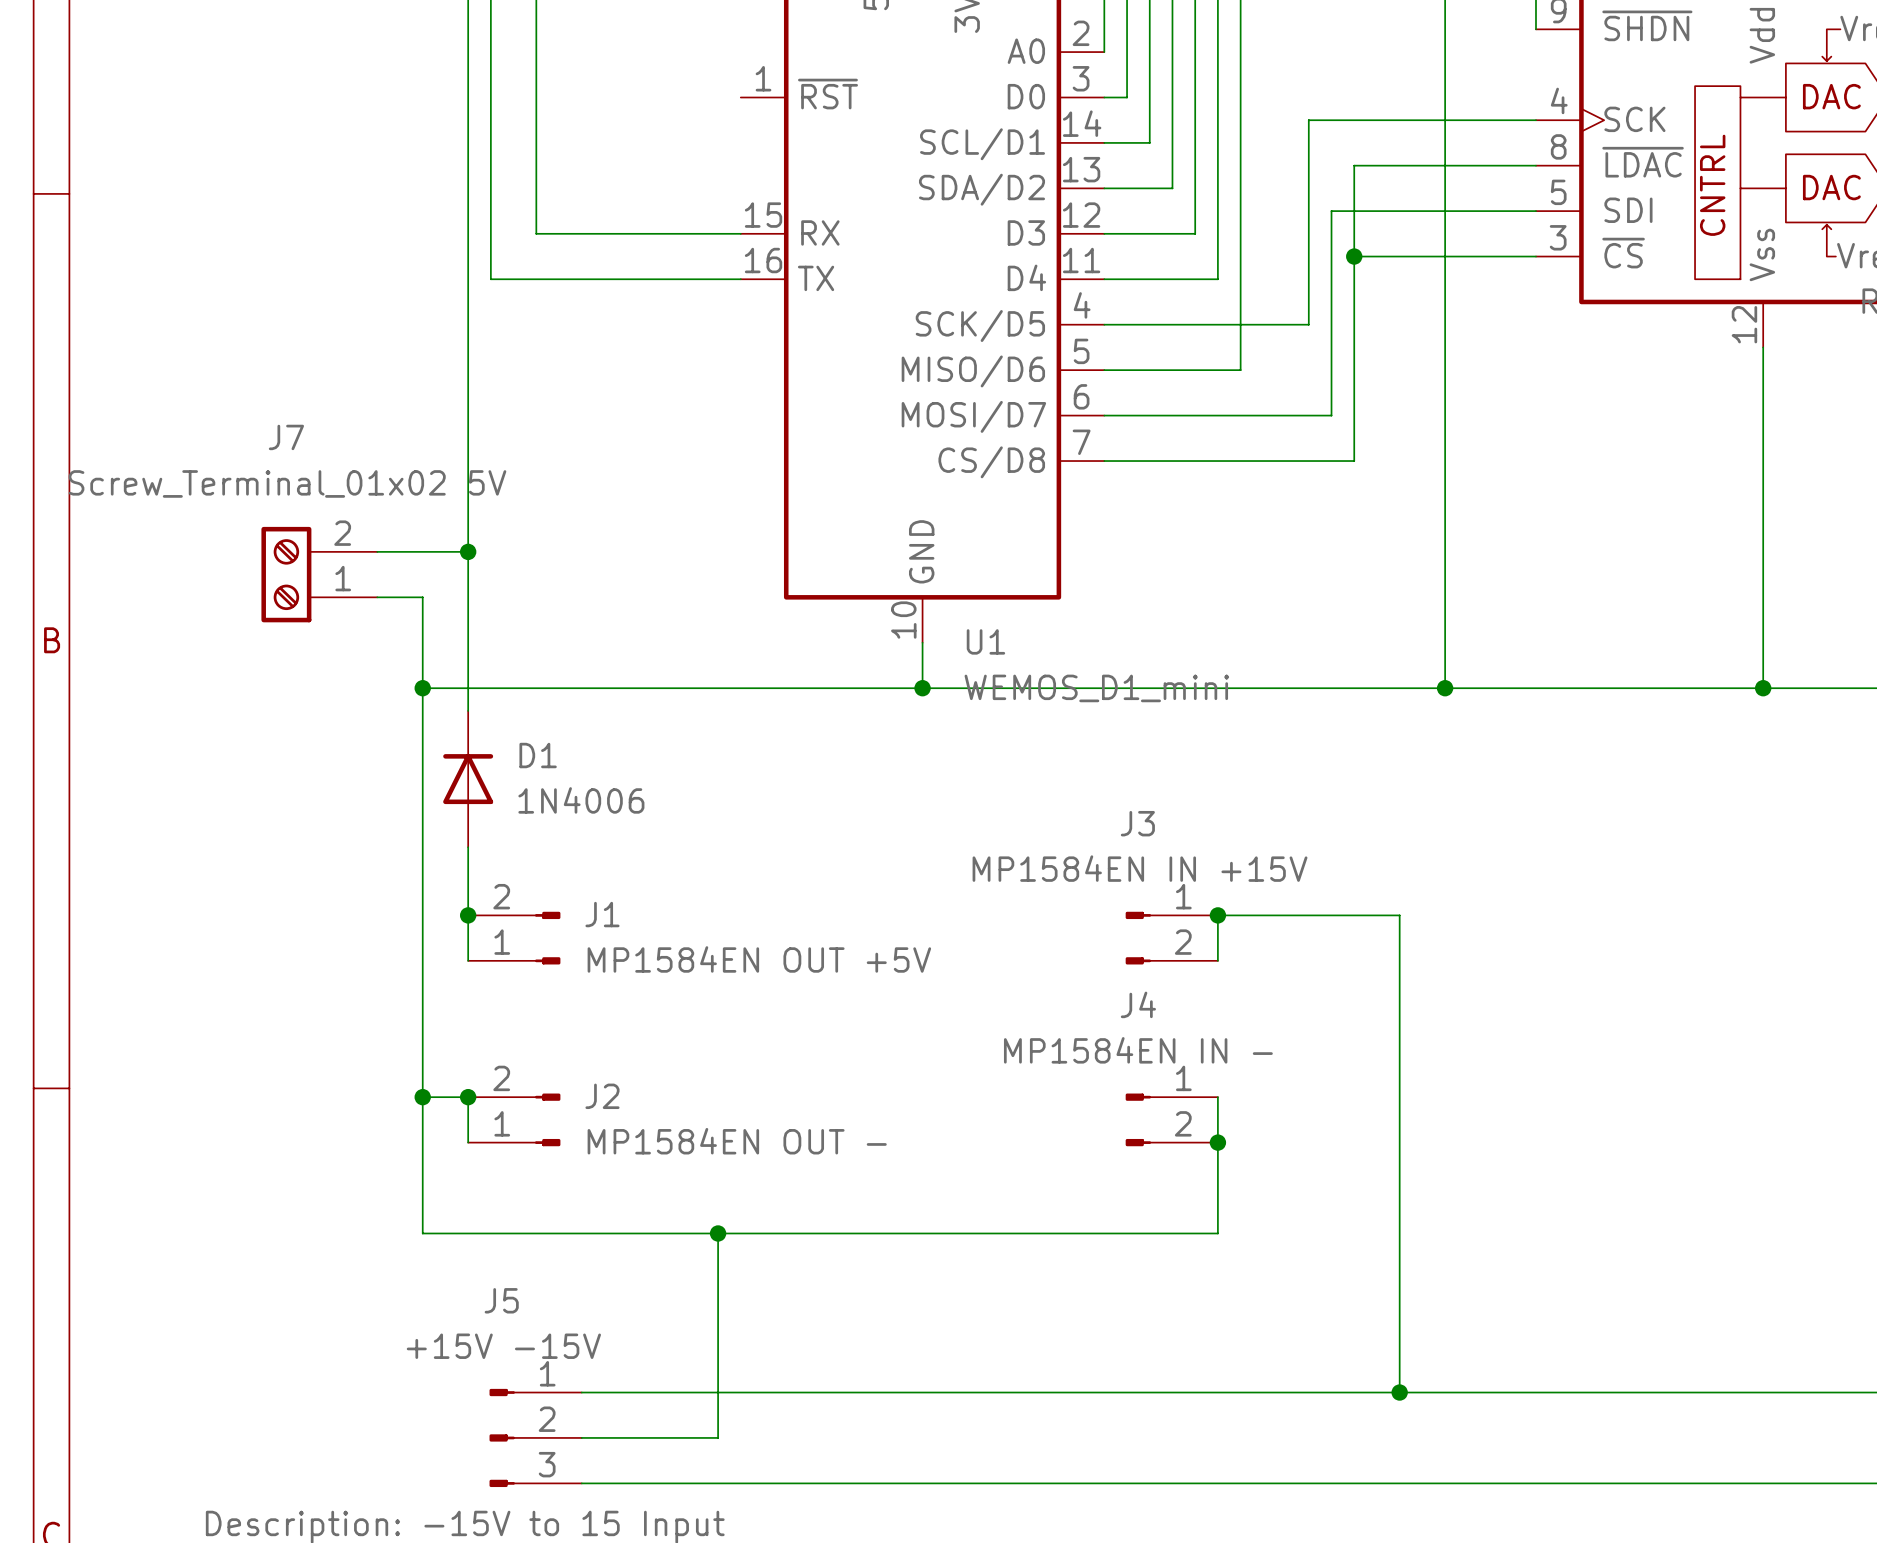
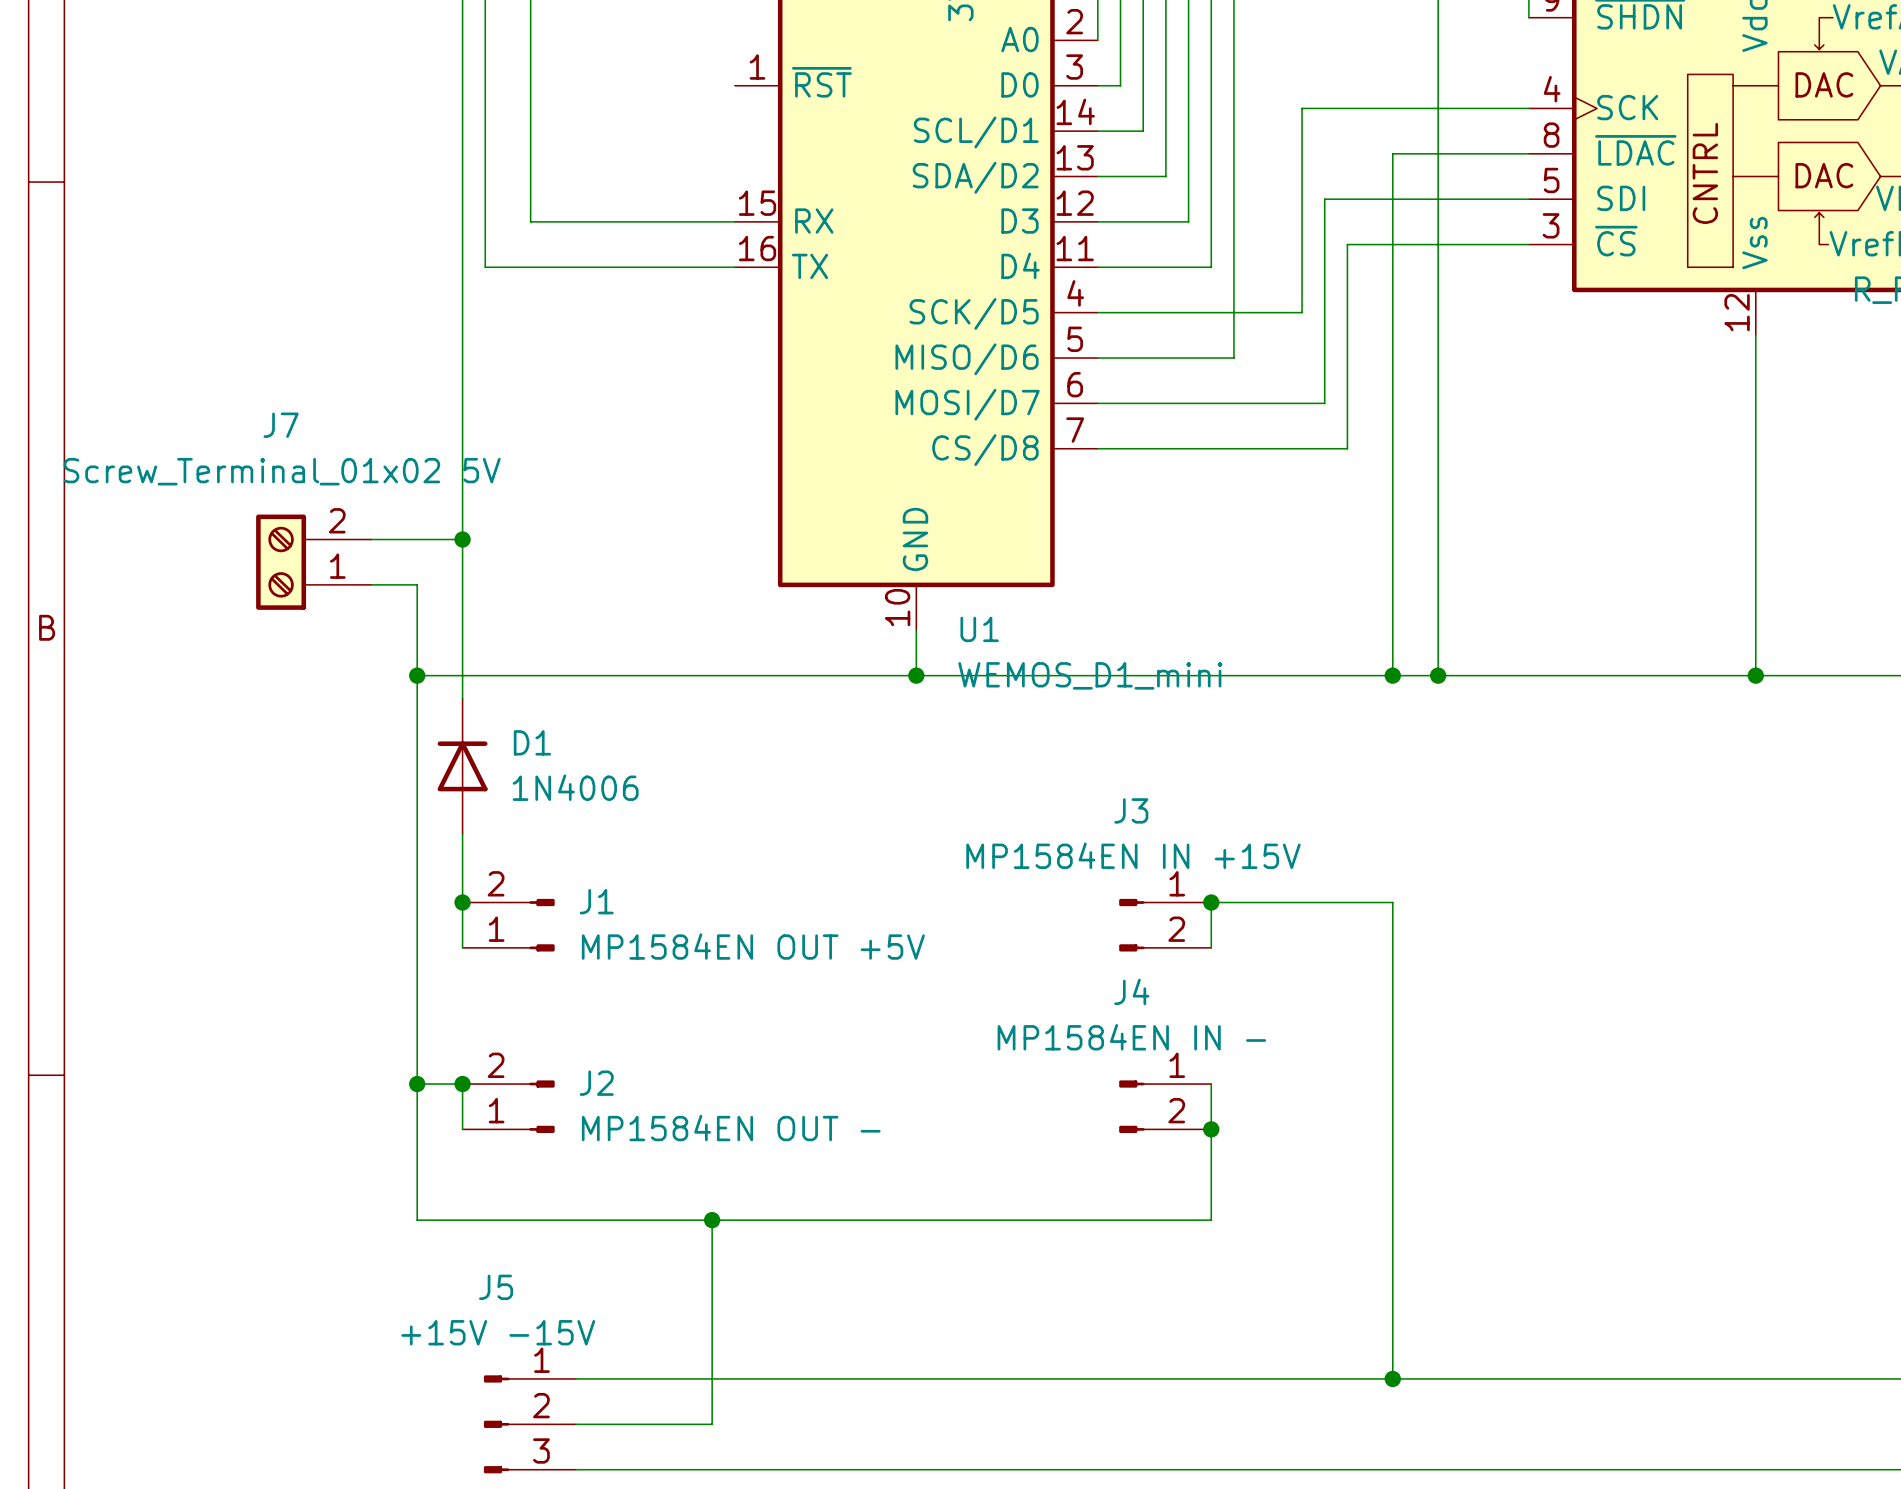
wire: (1399, 165) (1354, 165) (1354, 256) -> (1392, 153) (1392, 675)
junction: (1354, 256) -> none
junction: none -> (1392, 675)

